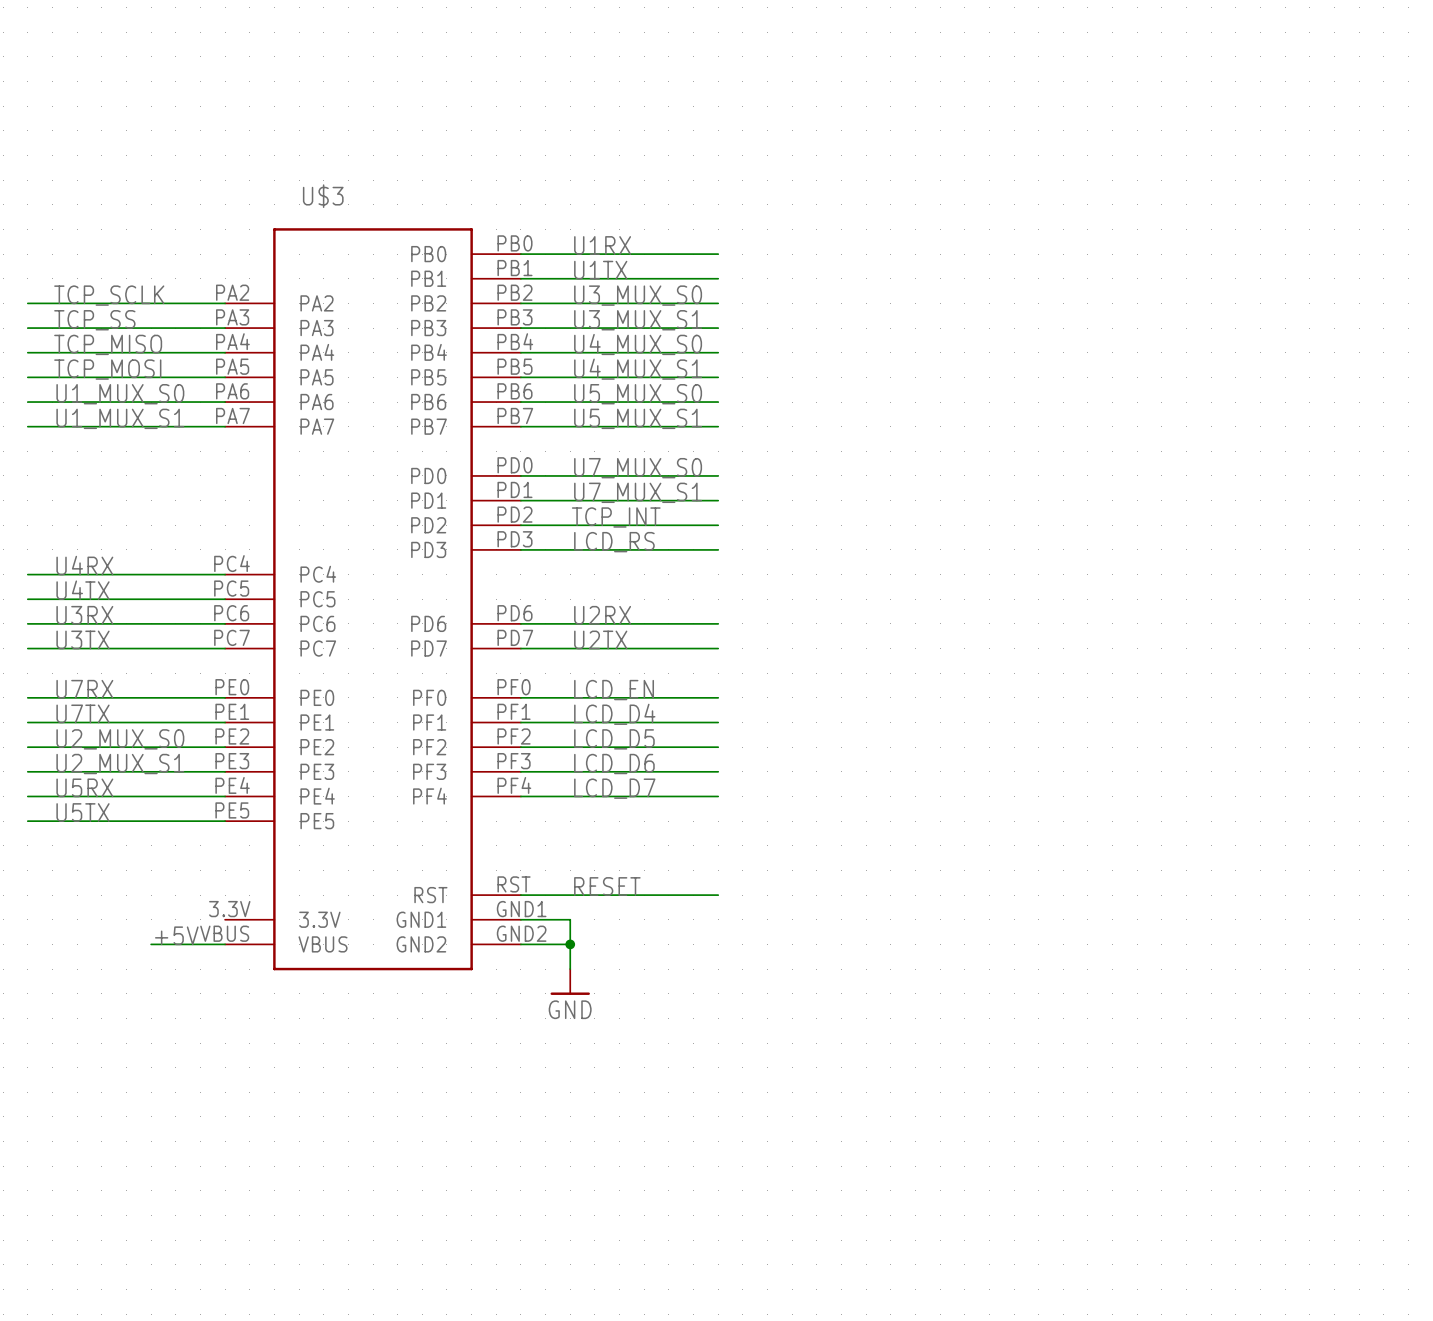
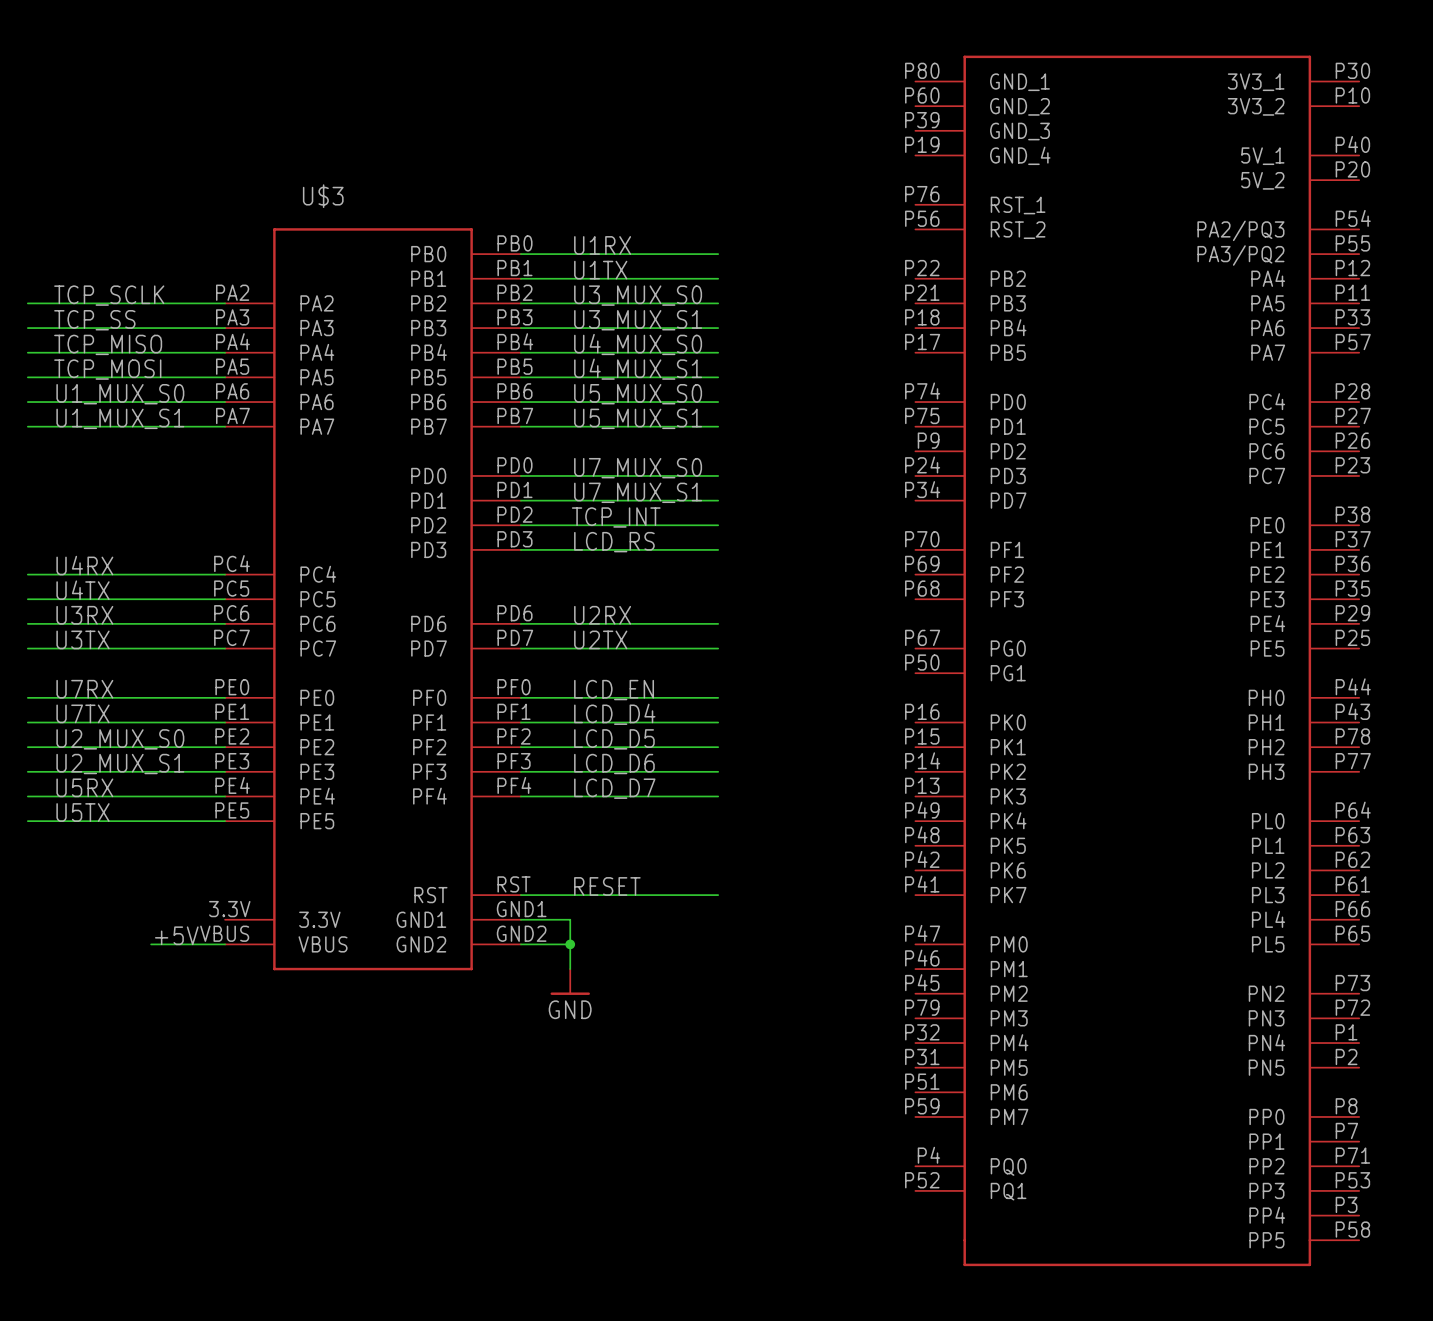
part: none -> (1137, 660)

